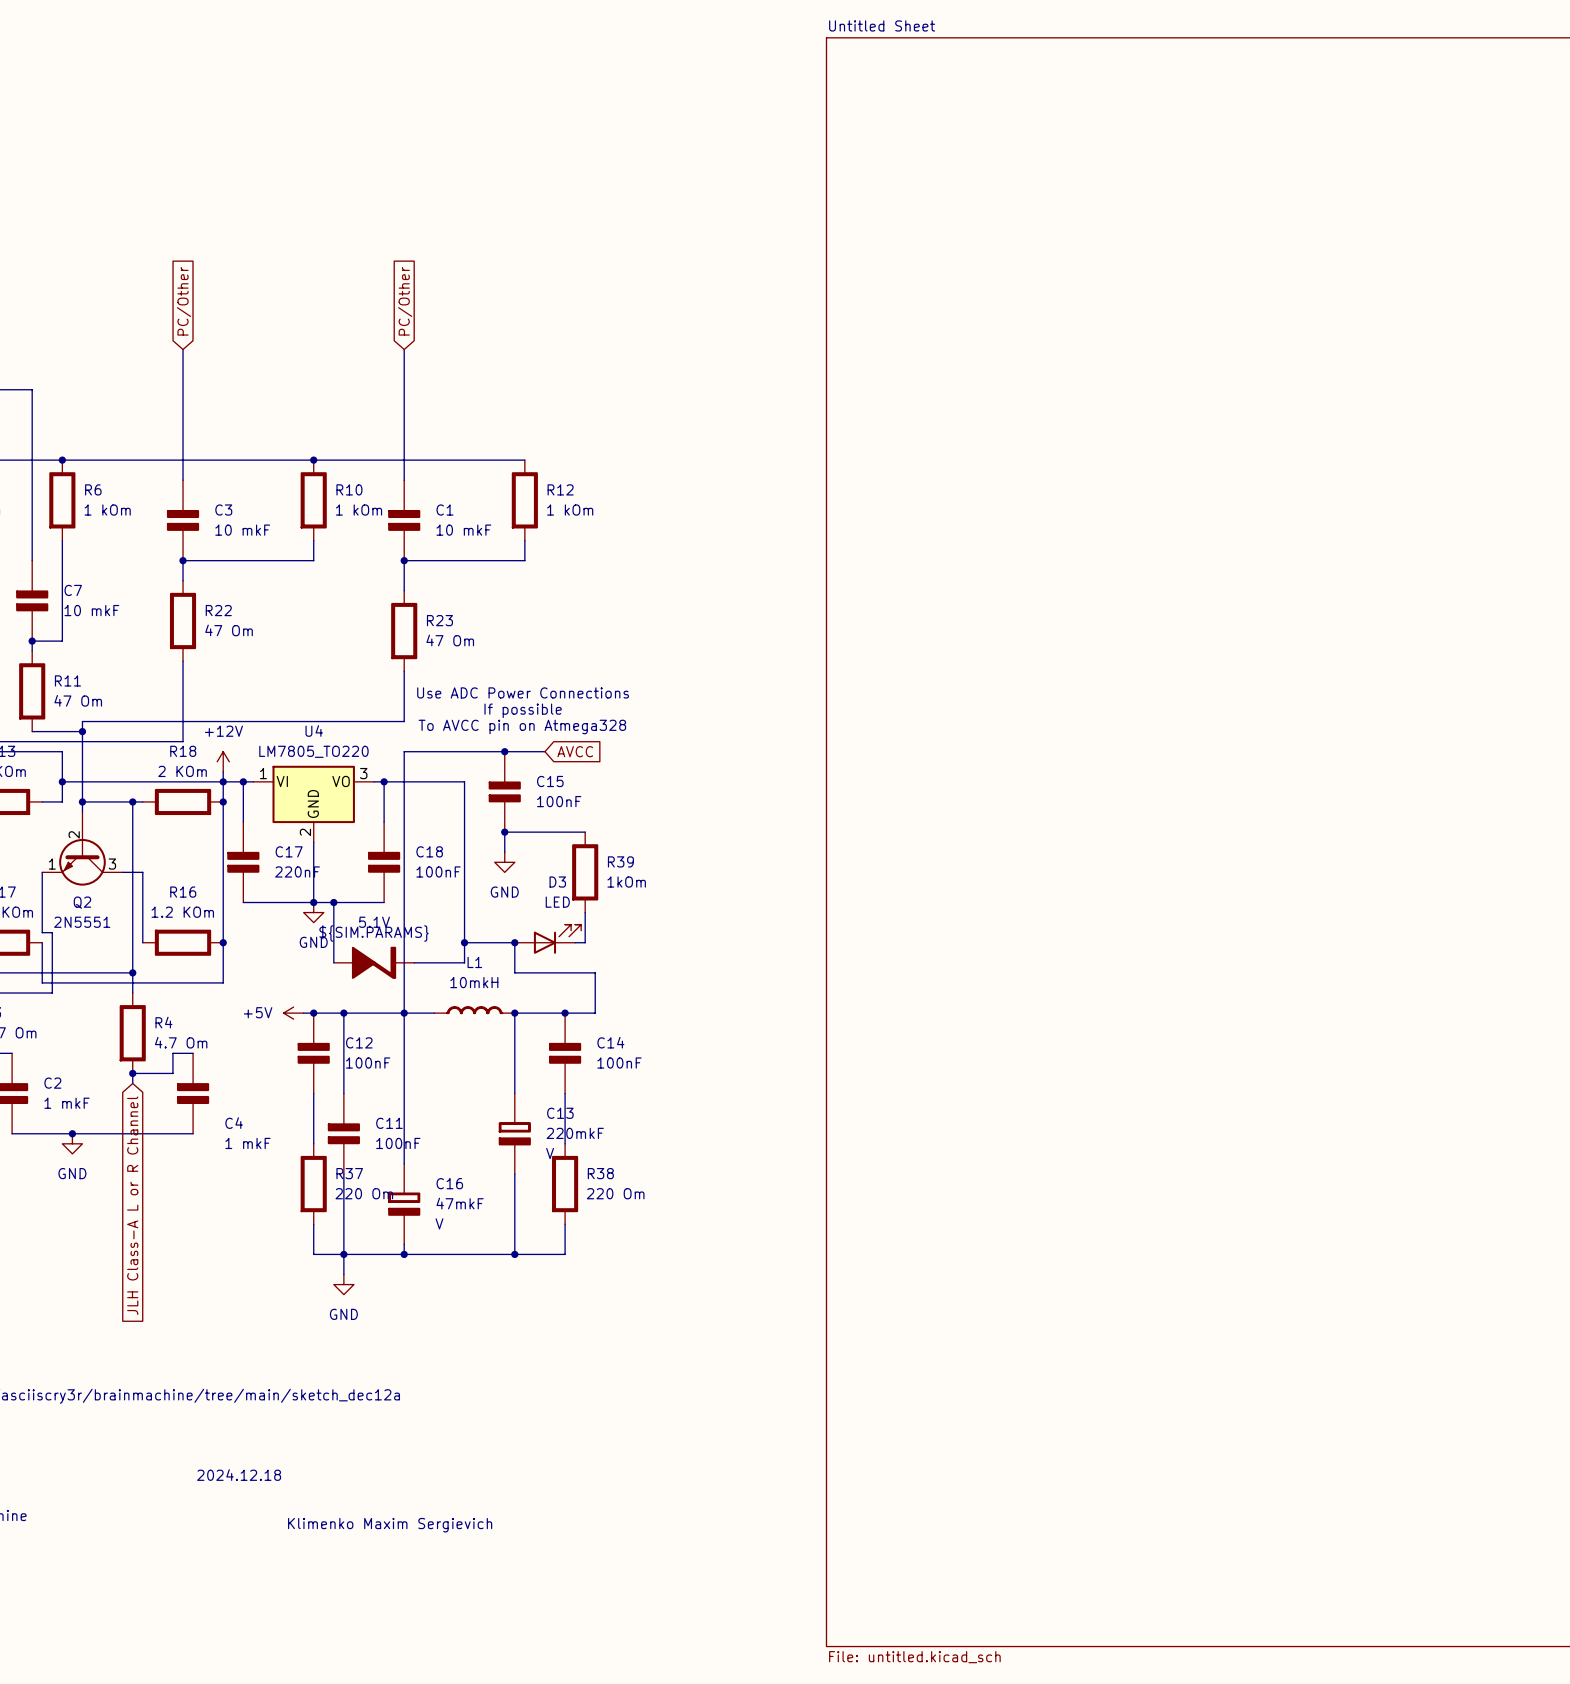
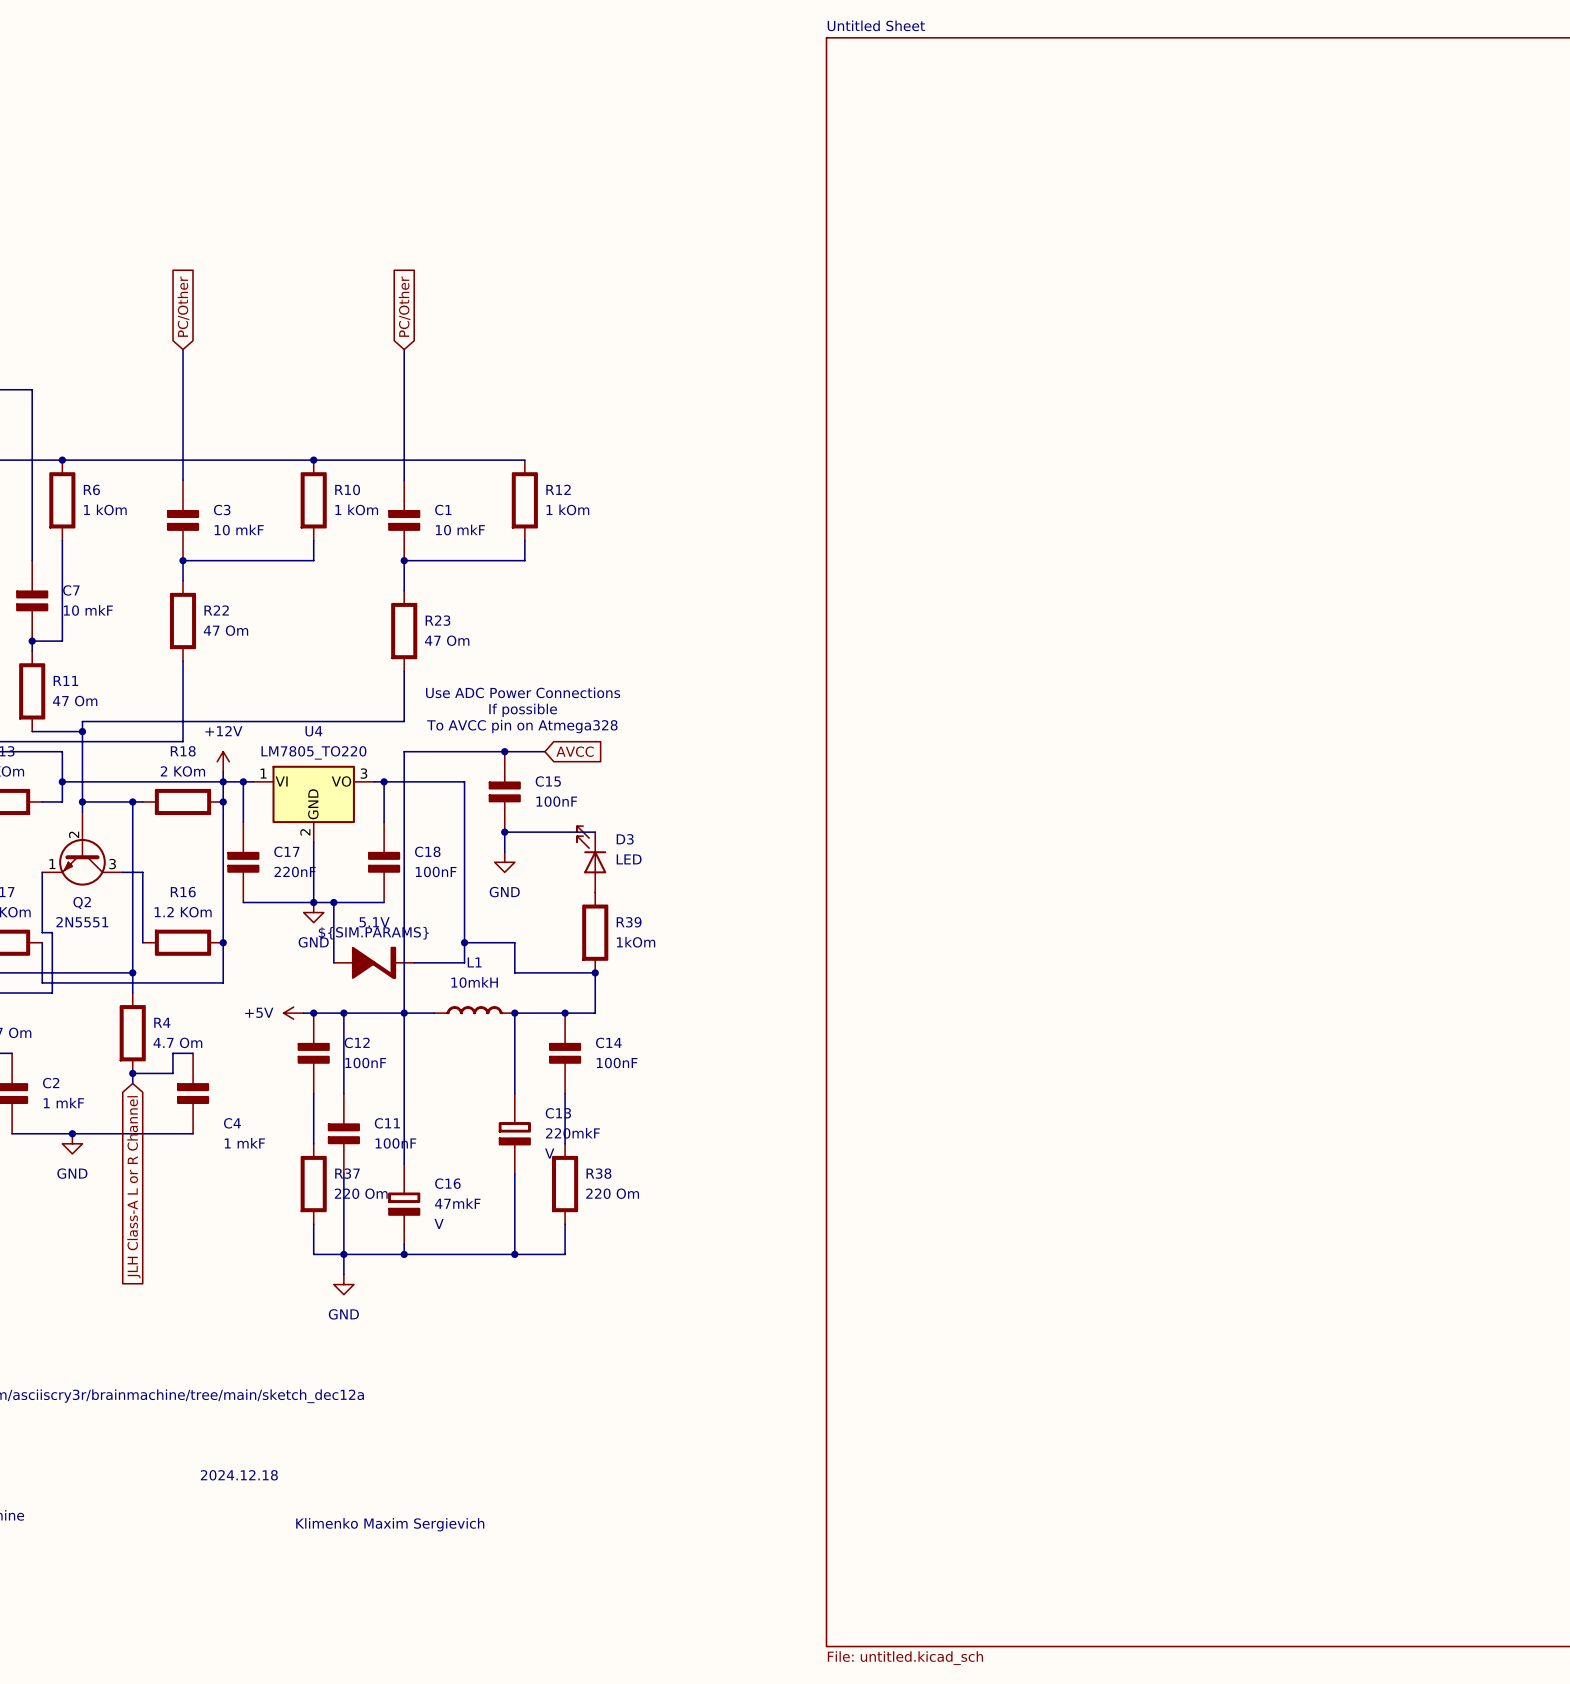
wire: none -> (585, 832) (595, 832)
R39 position: (585, 872) -> (595, 932)
D3 name position: D3 (557, 882) -> D3 (625, 839)
D3 value position: LED (557, 902) -> LED (629, 859)
D3 position: (547, 939) -> (591, 859)
D3 rotation: 0° (557, 939) -> 90° counterclockwise (591, 849)
junction: (514, 942) -> none
junction: none -> (595, 972)

